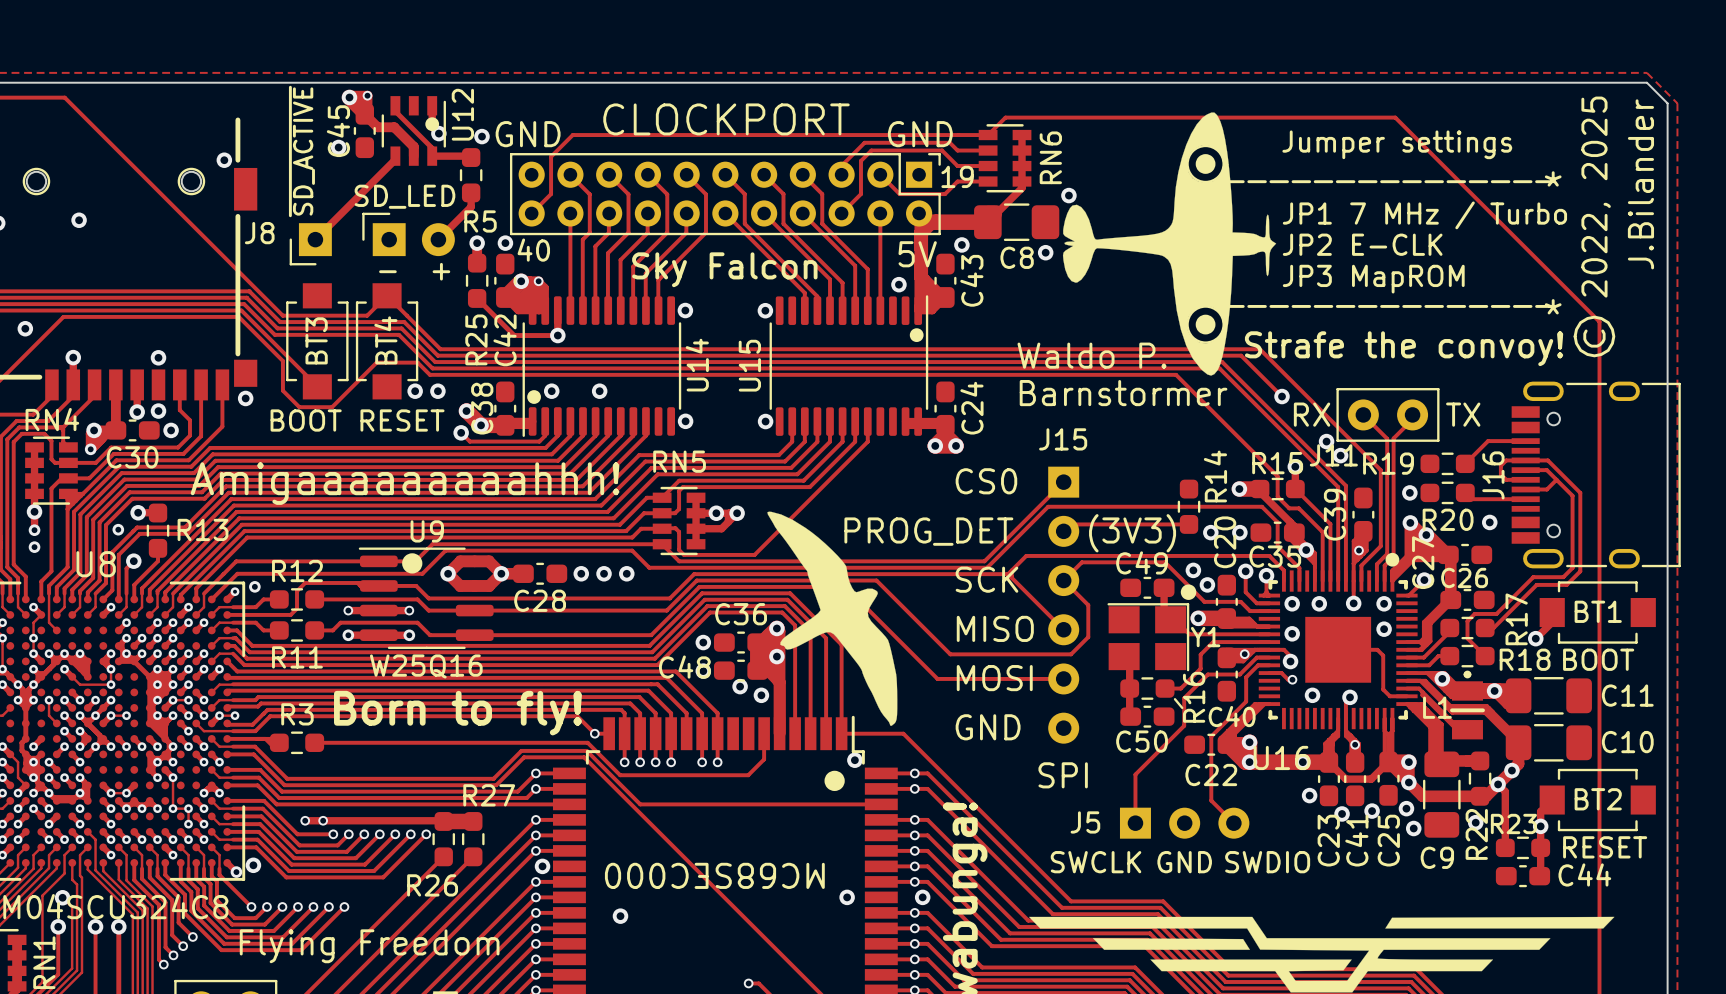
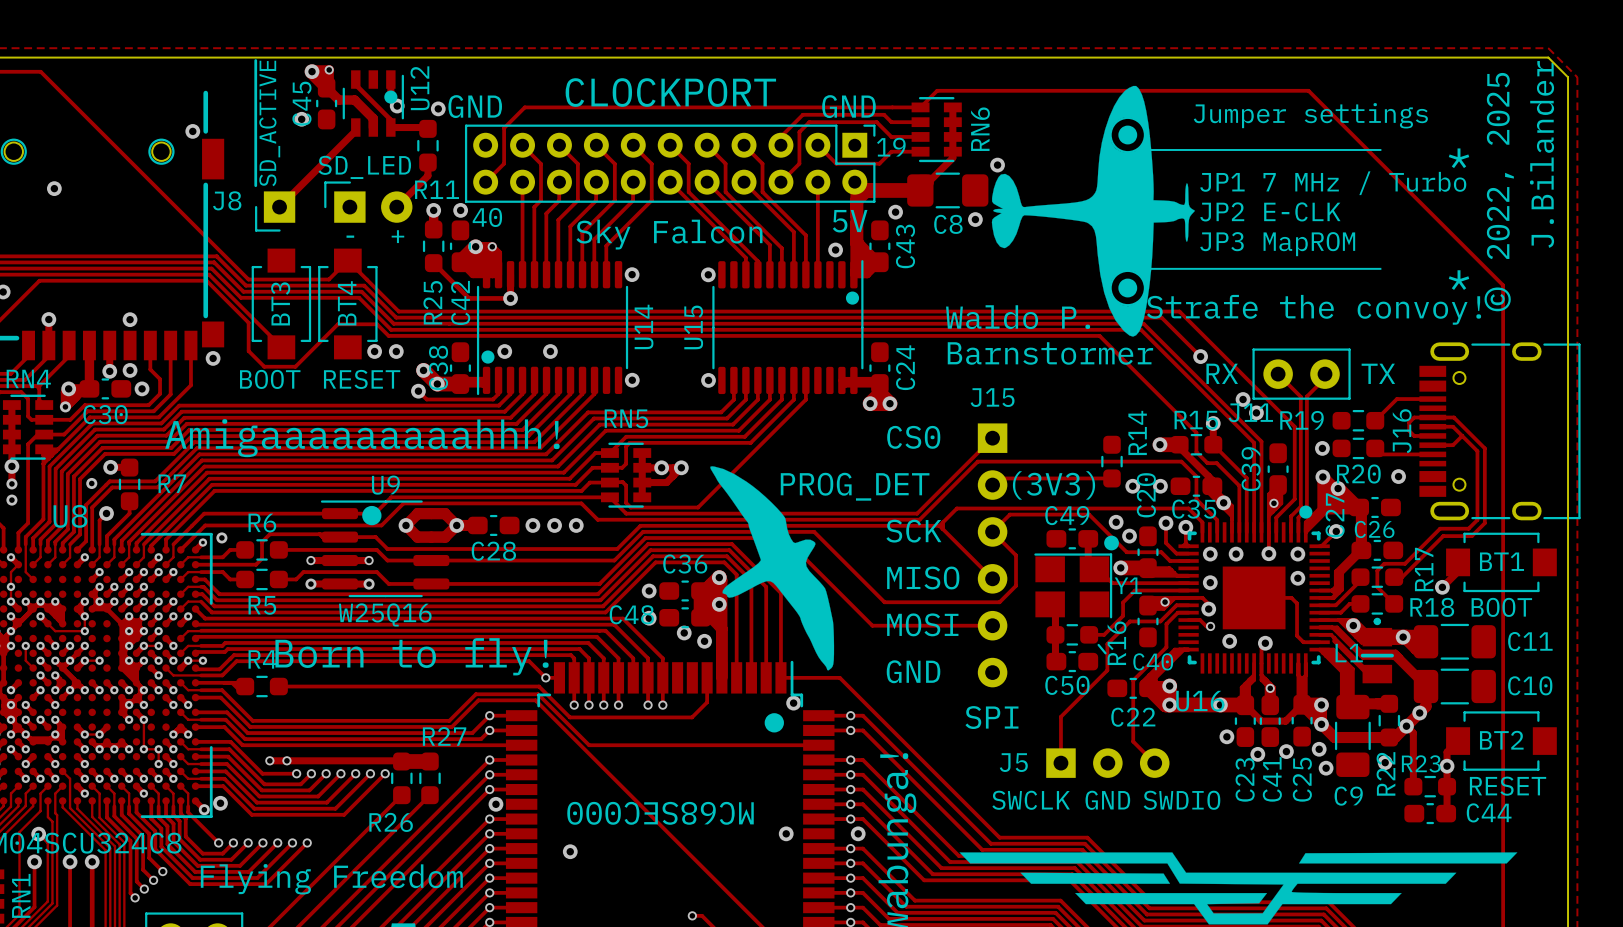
R5 name: R5 (480, 221) -> R11 (437, 189)
R13 name: R13 (203, 529) -> R7 (172, 483)
R12 name: R12 (297, 571) -> R6 (262, 523)
R11 name: R11 (297, 657) -> R5 (262, 605)
R3 name: R3 (297, 714) -> R4 (262, 659)

